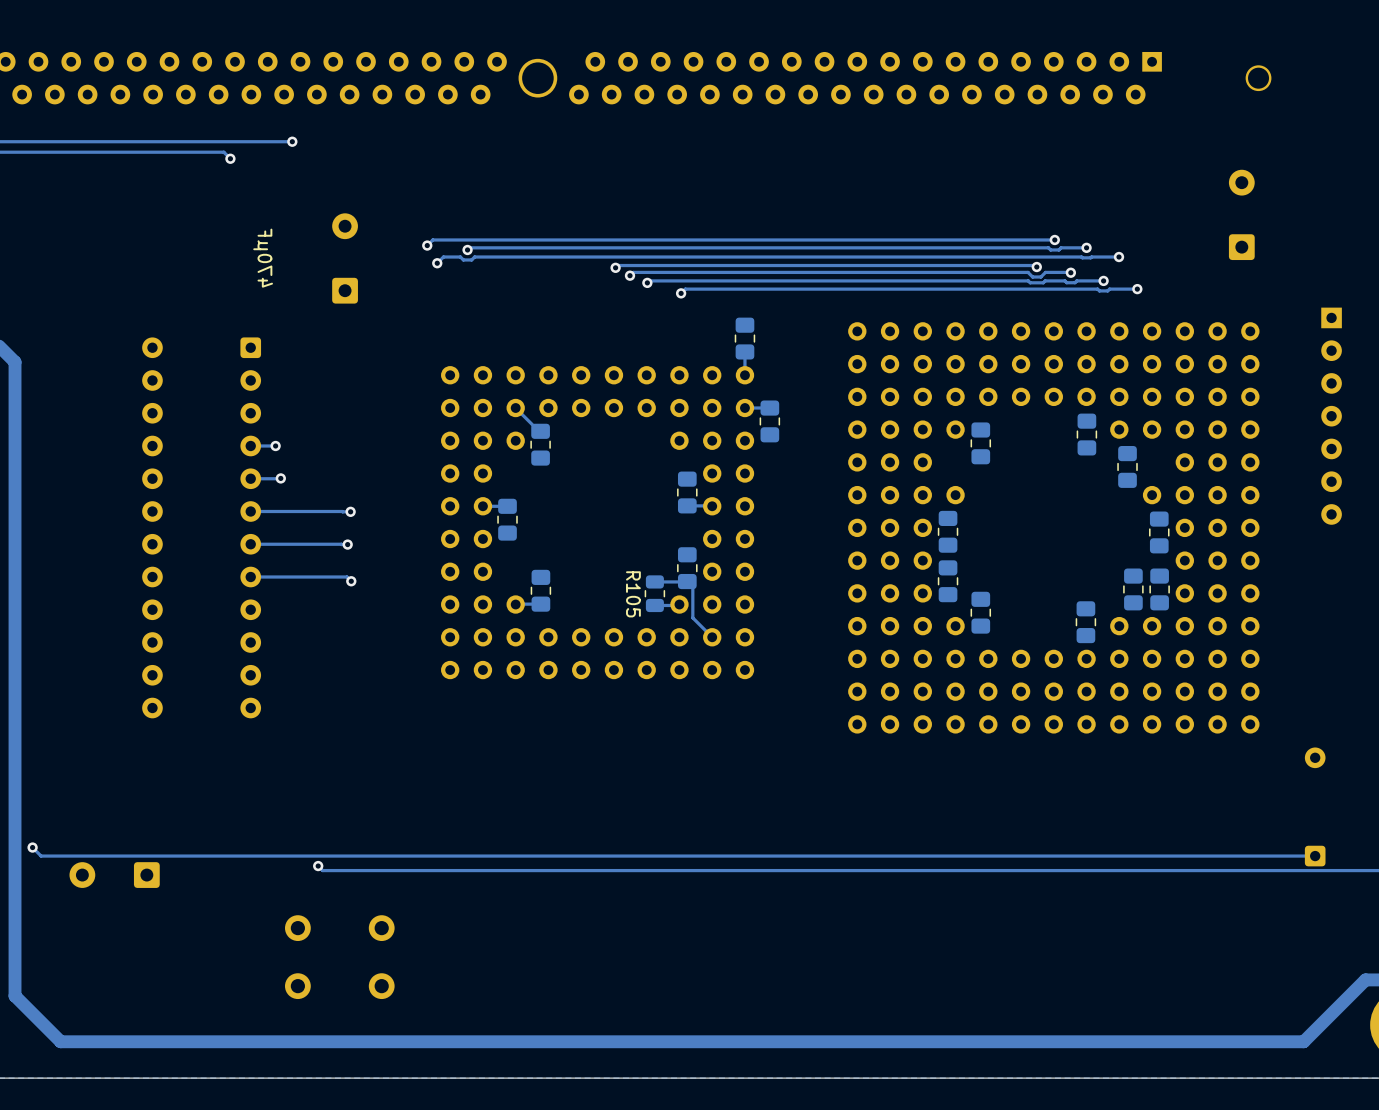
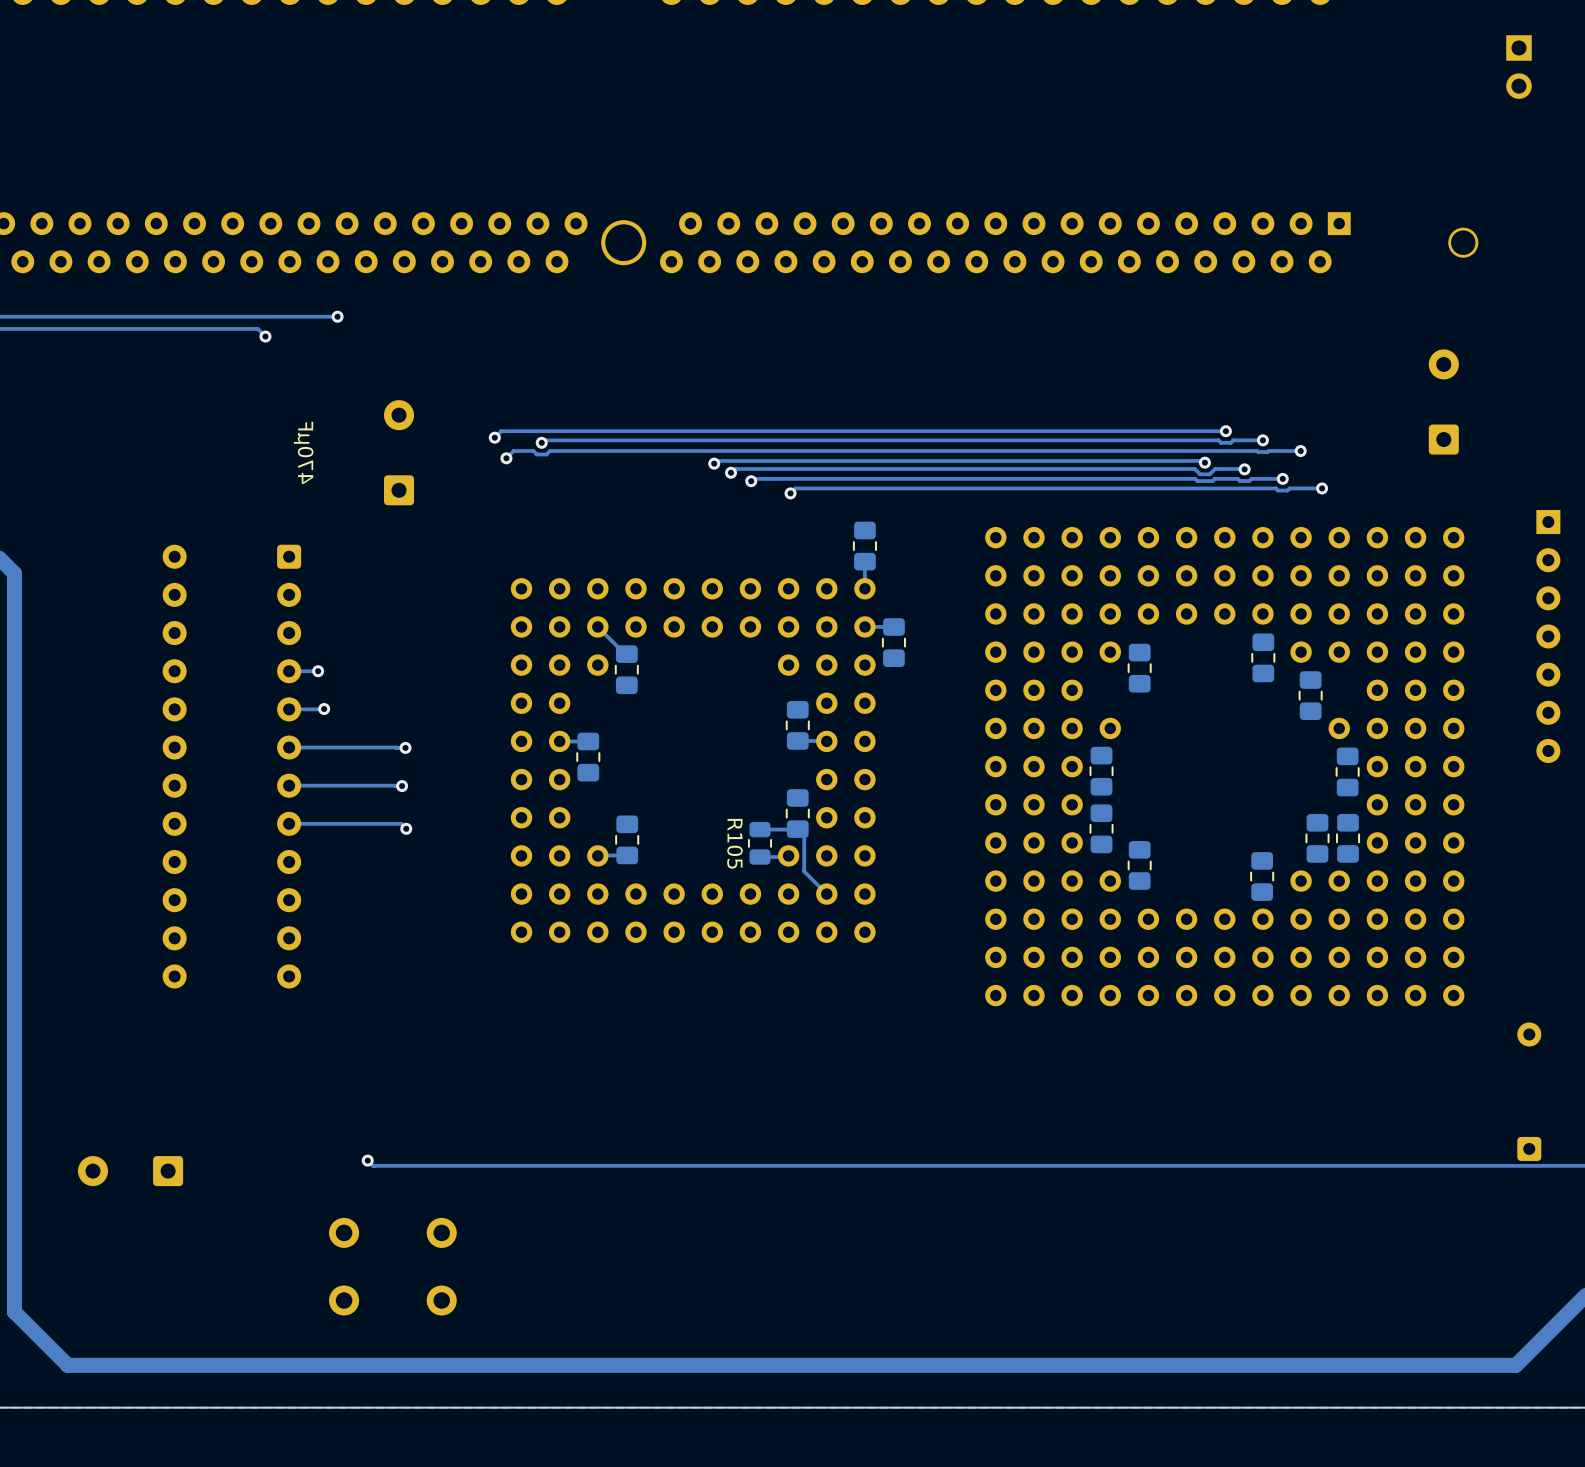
track: (32, 847) (41, 856) (1315, 856) -> none
via: (32, 847) -> none

